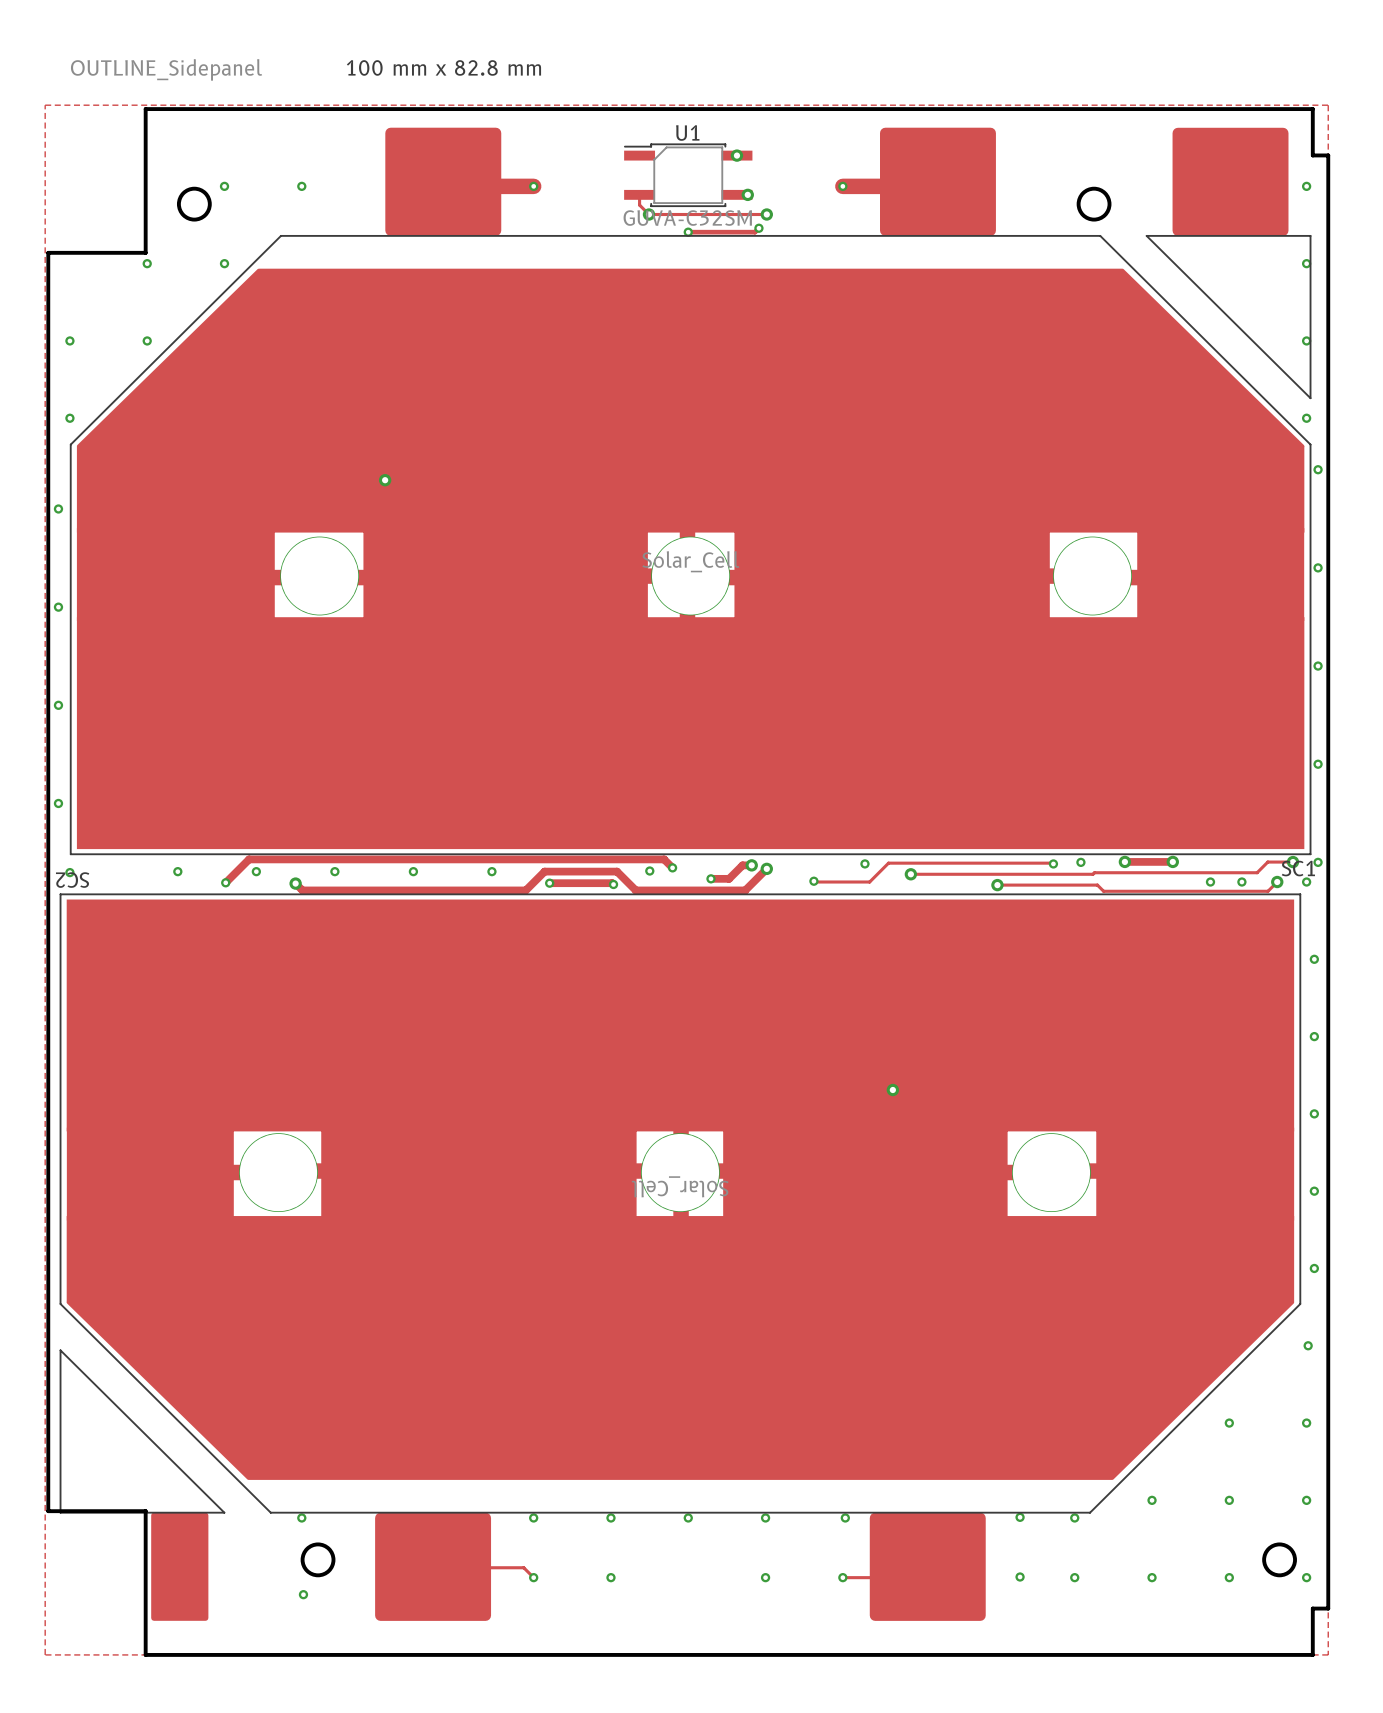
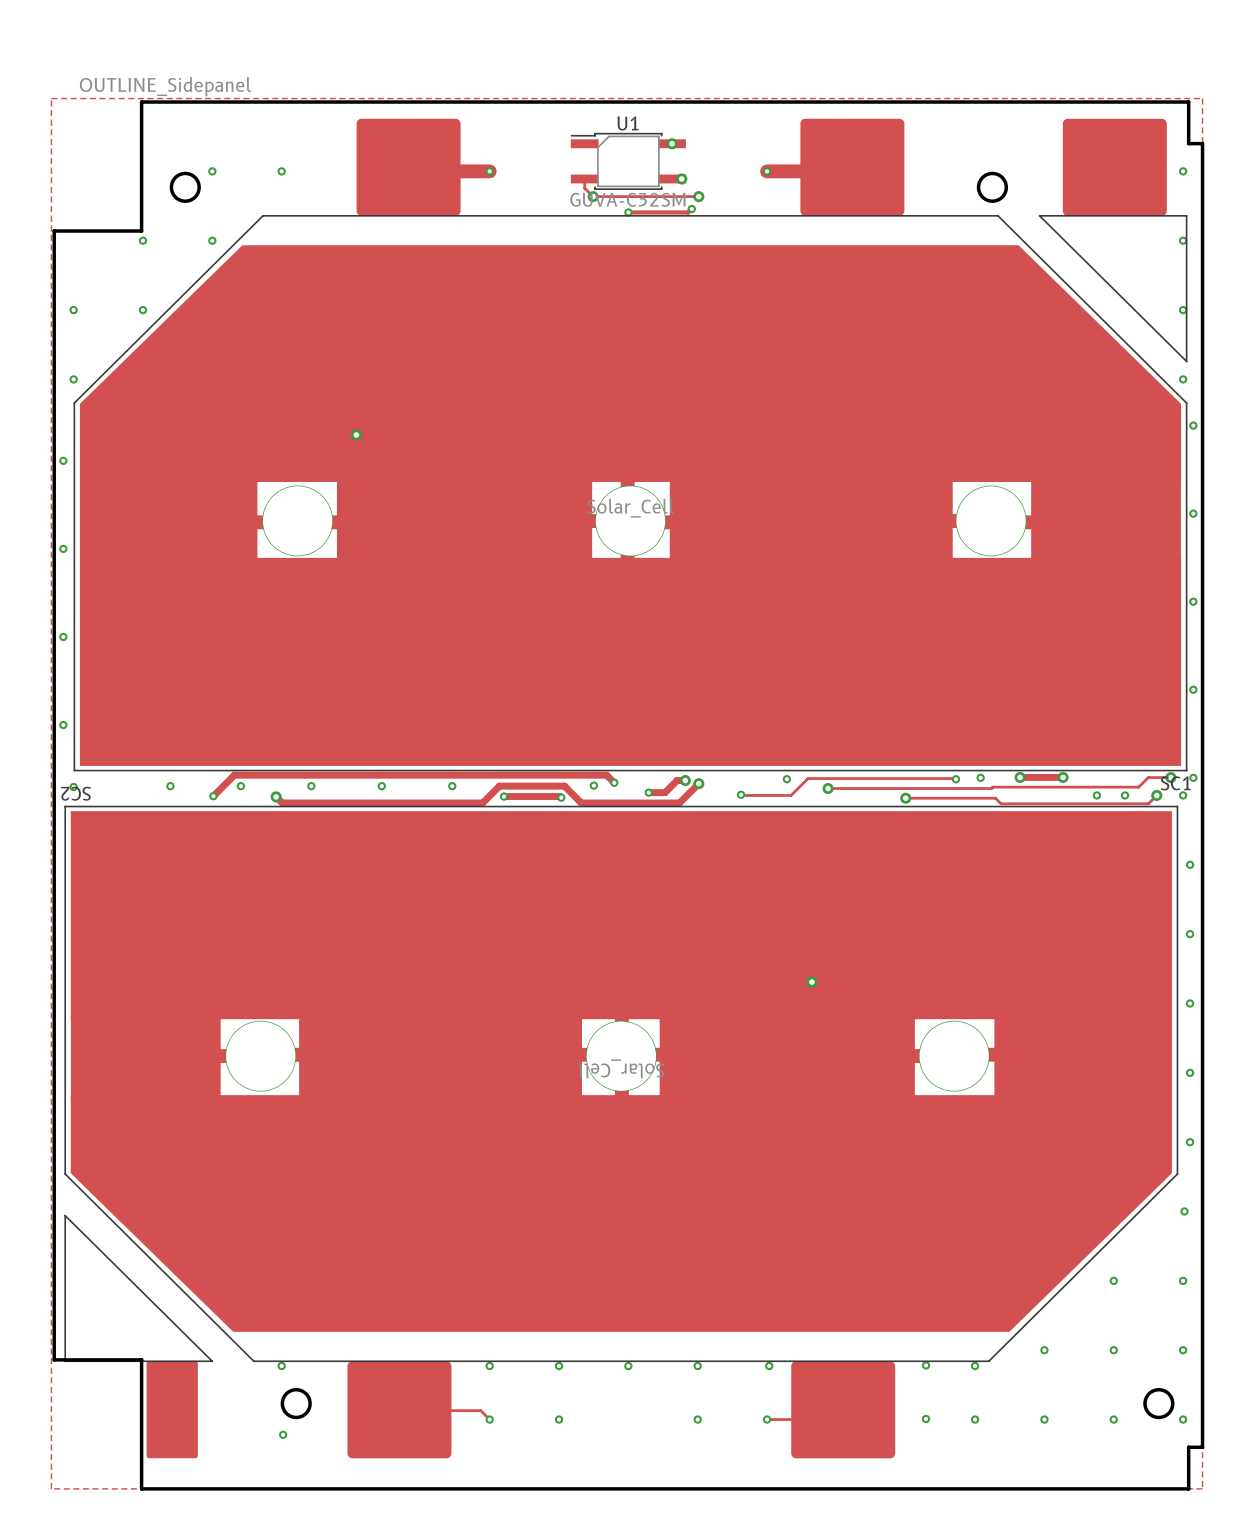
drawing shape: [46, 59, 1331, 1657] -> [52, 77, 1205, 1491]
text: 100 mm x 82.8 mm (443, 67) -> none

